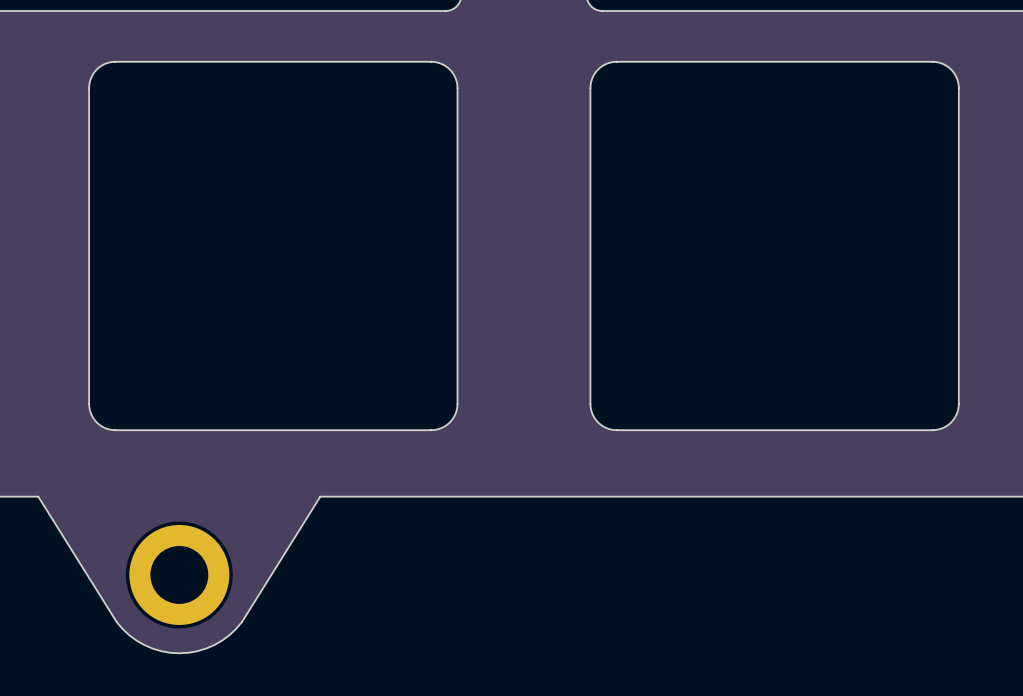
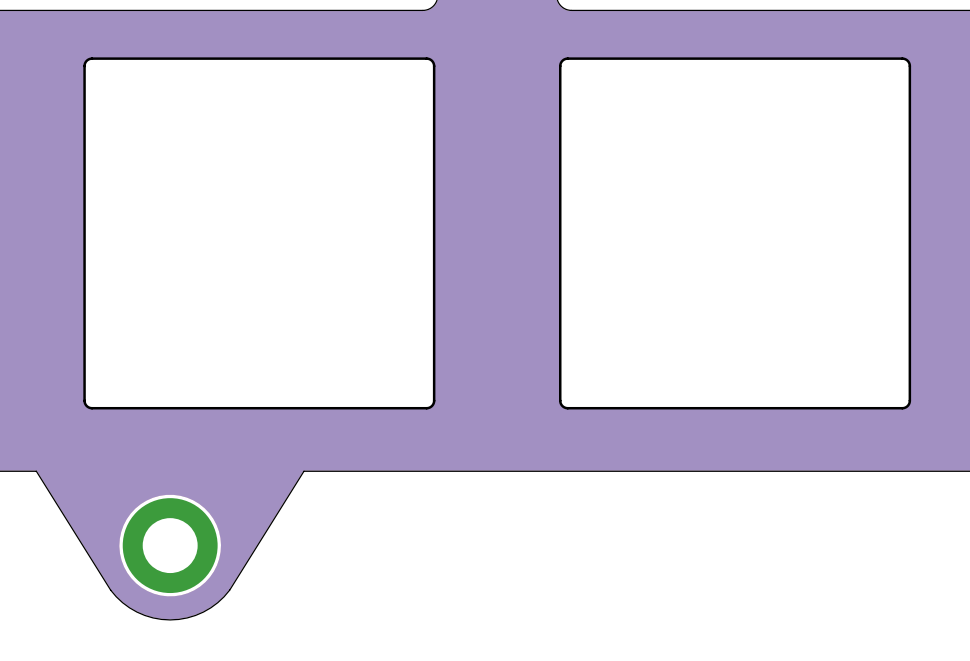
drawing shape: [88, 61, 459, 431] -> [83, 57, 436, 410]
drawing shape: [589, 61, 960, 431] -> [559, 57, 912, 410]

